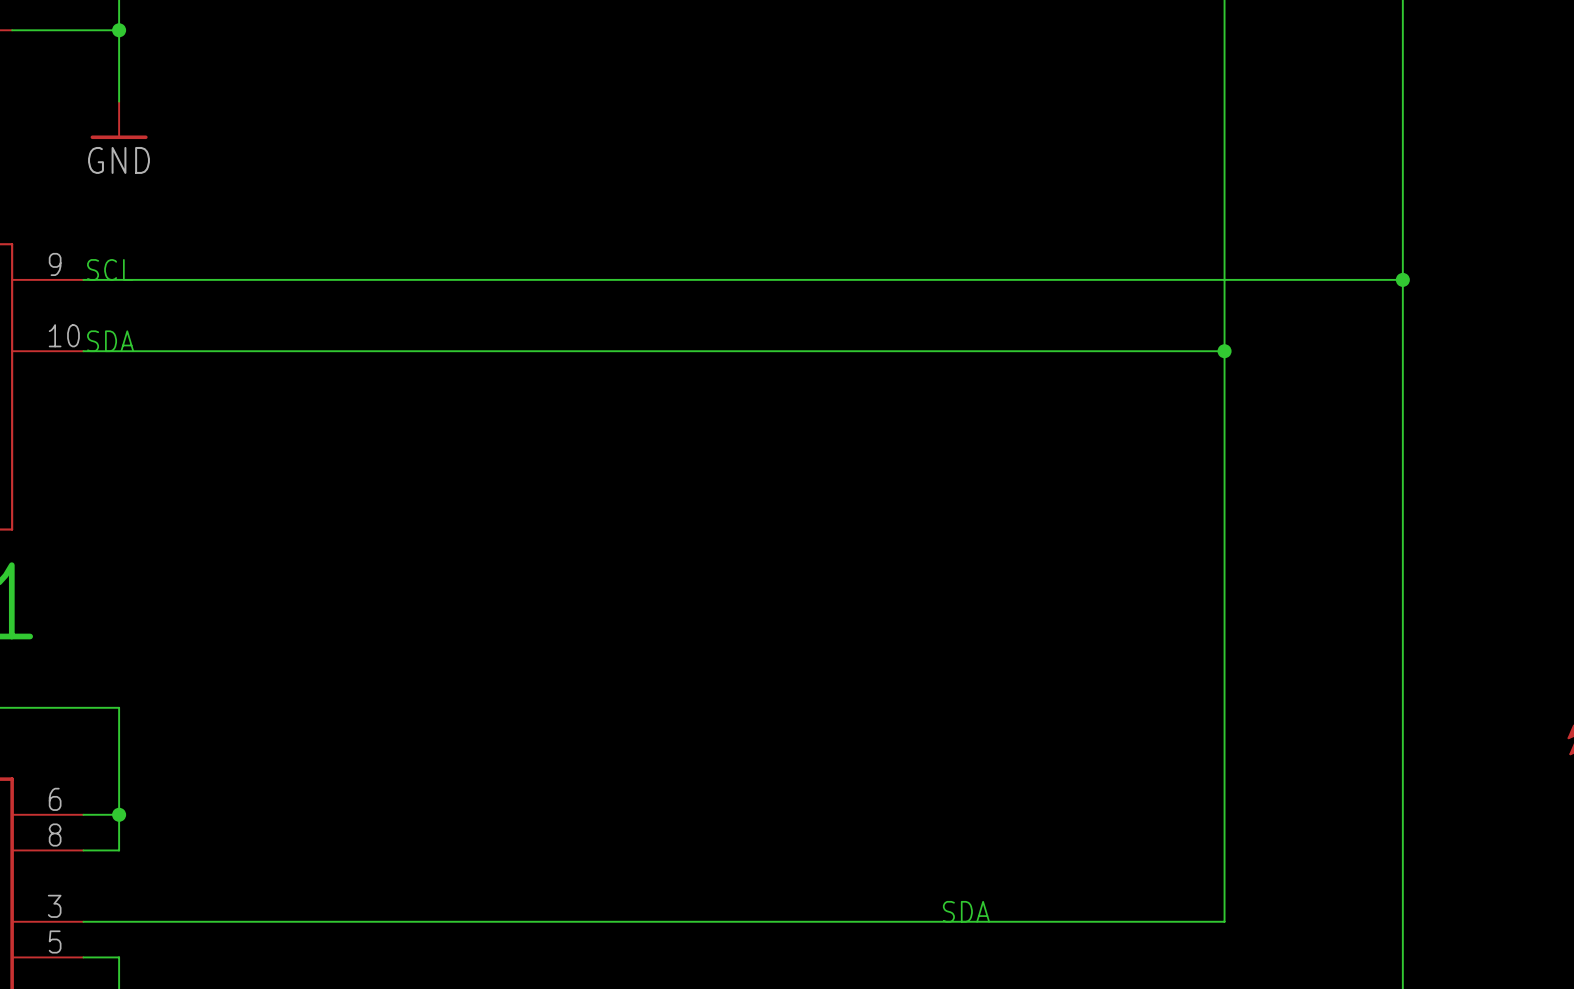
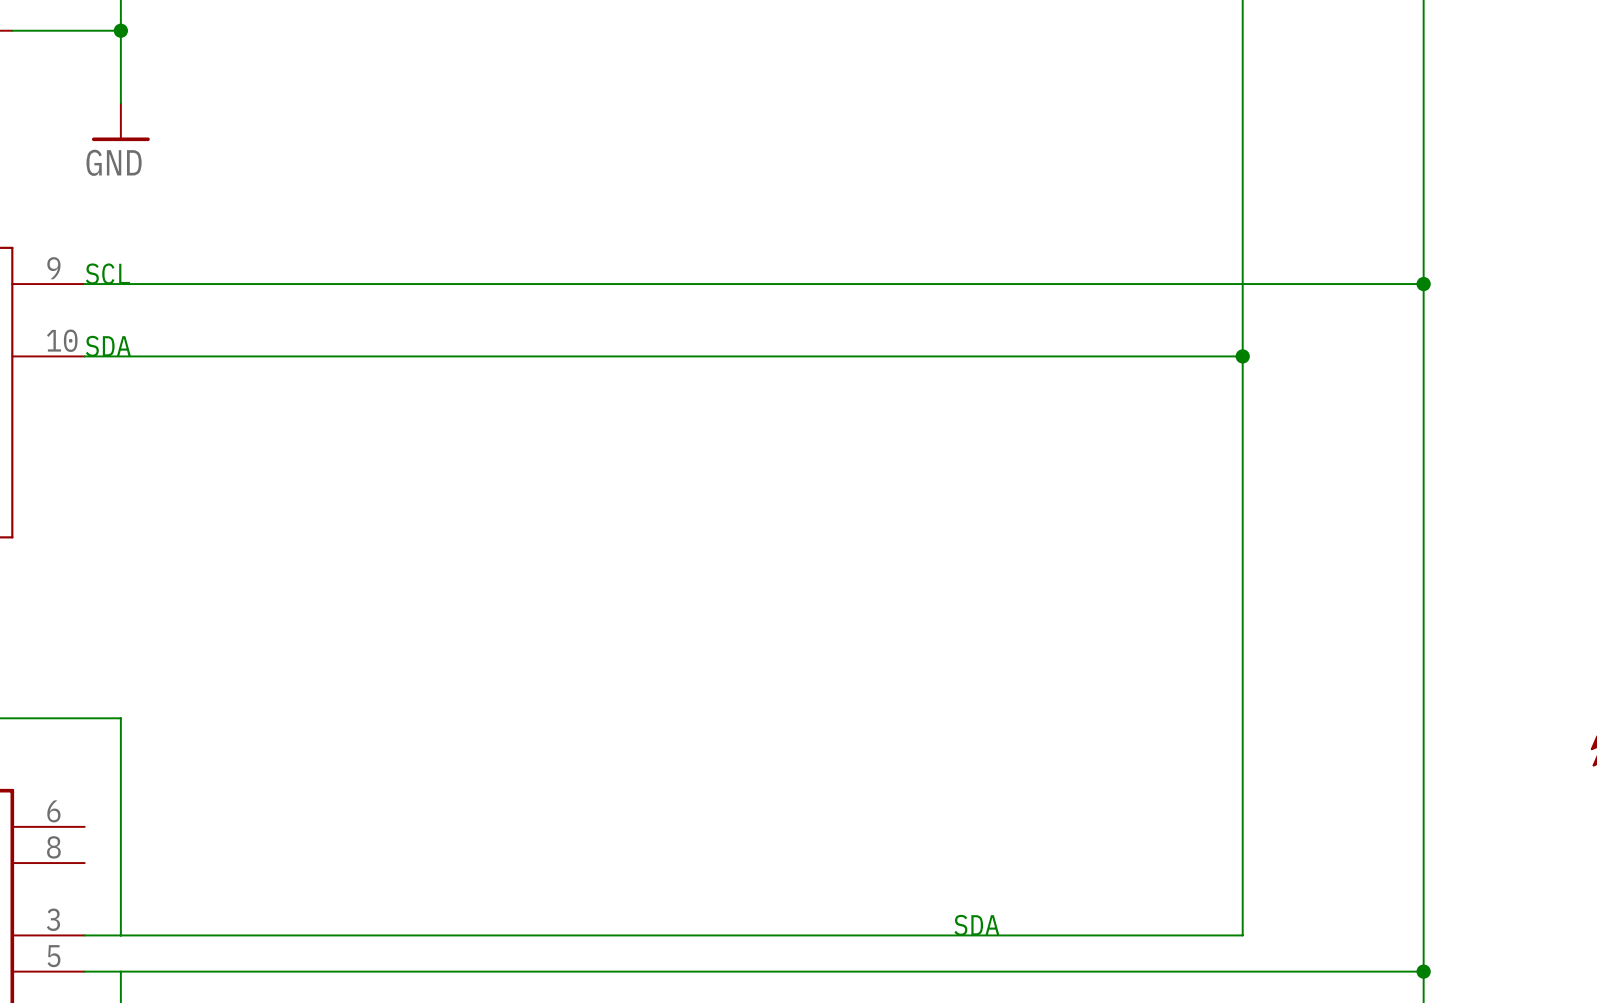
wire: (83, 814) (119, 814) -> none
junction: (119, 814) -> none
wire: (83, 850) (119, 850) -> (120, 935) (120, 863)
wire: none -> (120, 971) (1423, 971)
junction: none -> (1423, 971)

